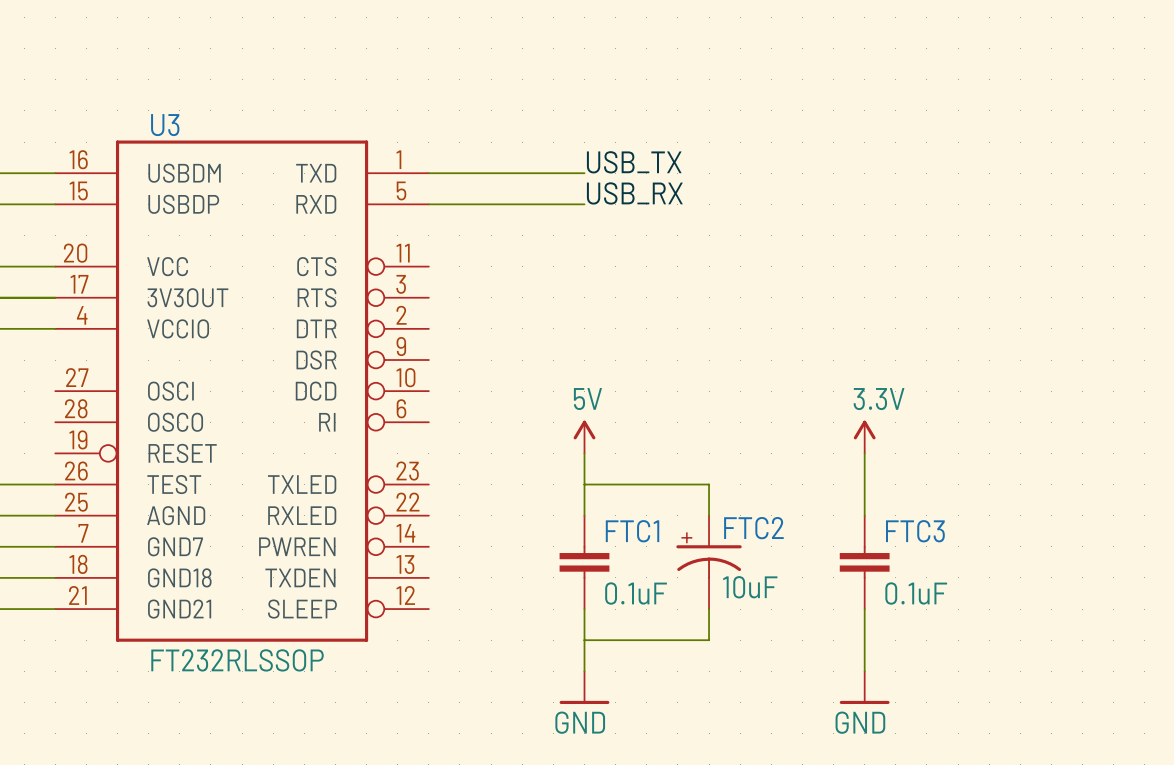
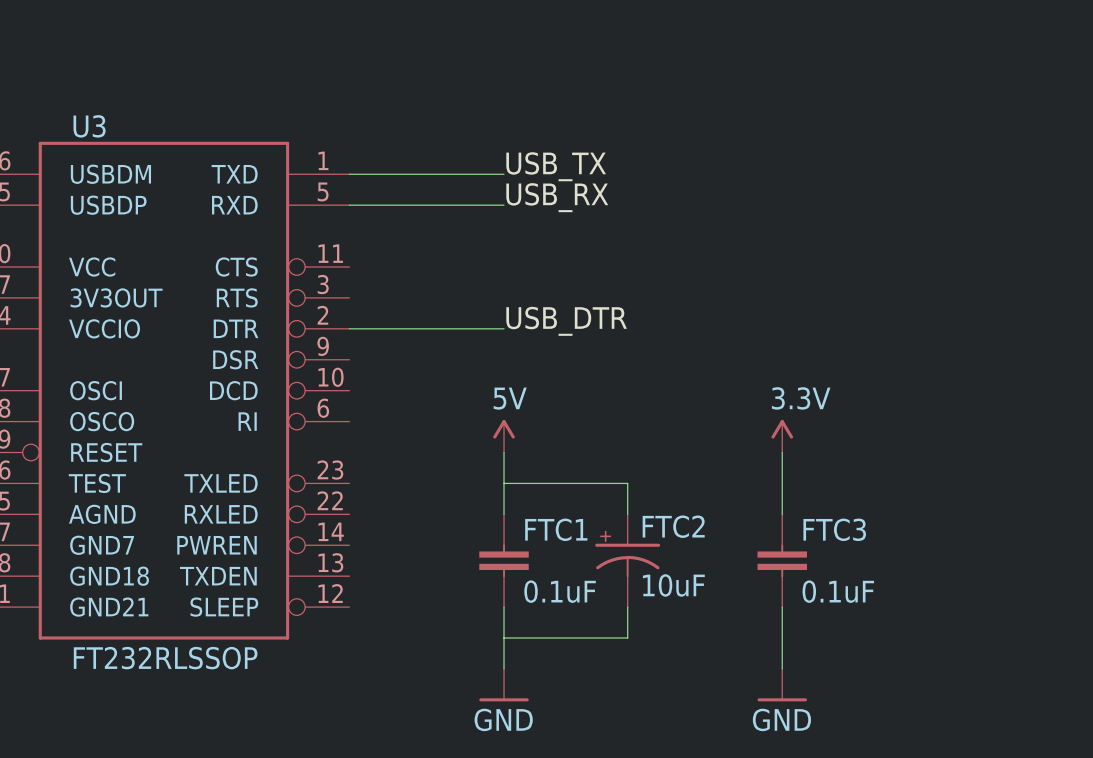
label: none -> USB_DTR (566, 321)
wire: none -> (349, 328) (504, 328)

